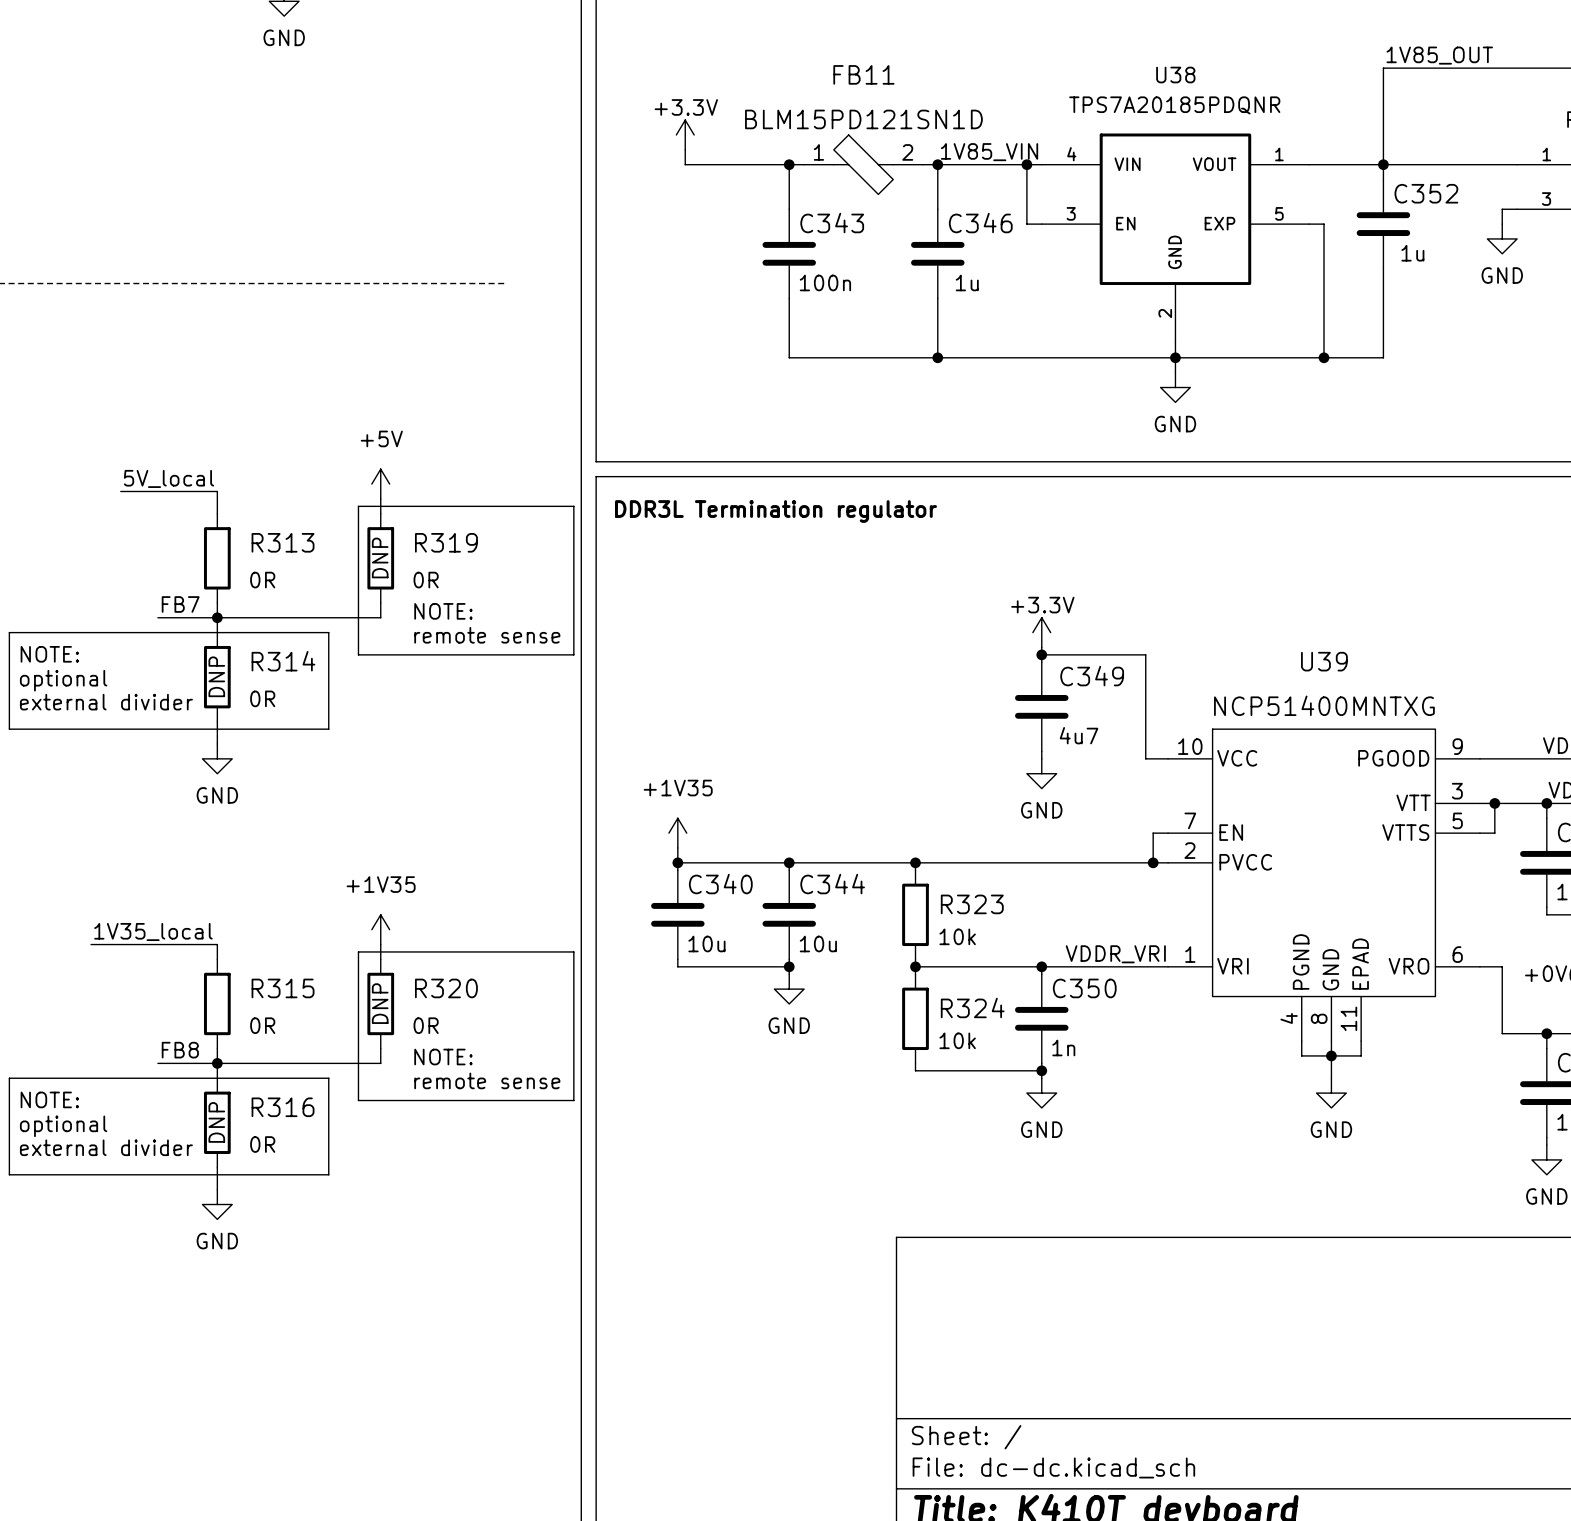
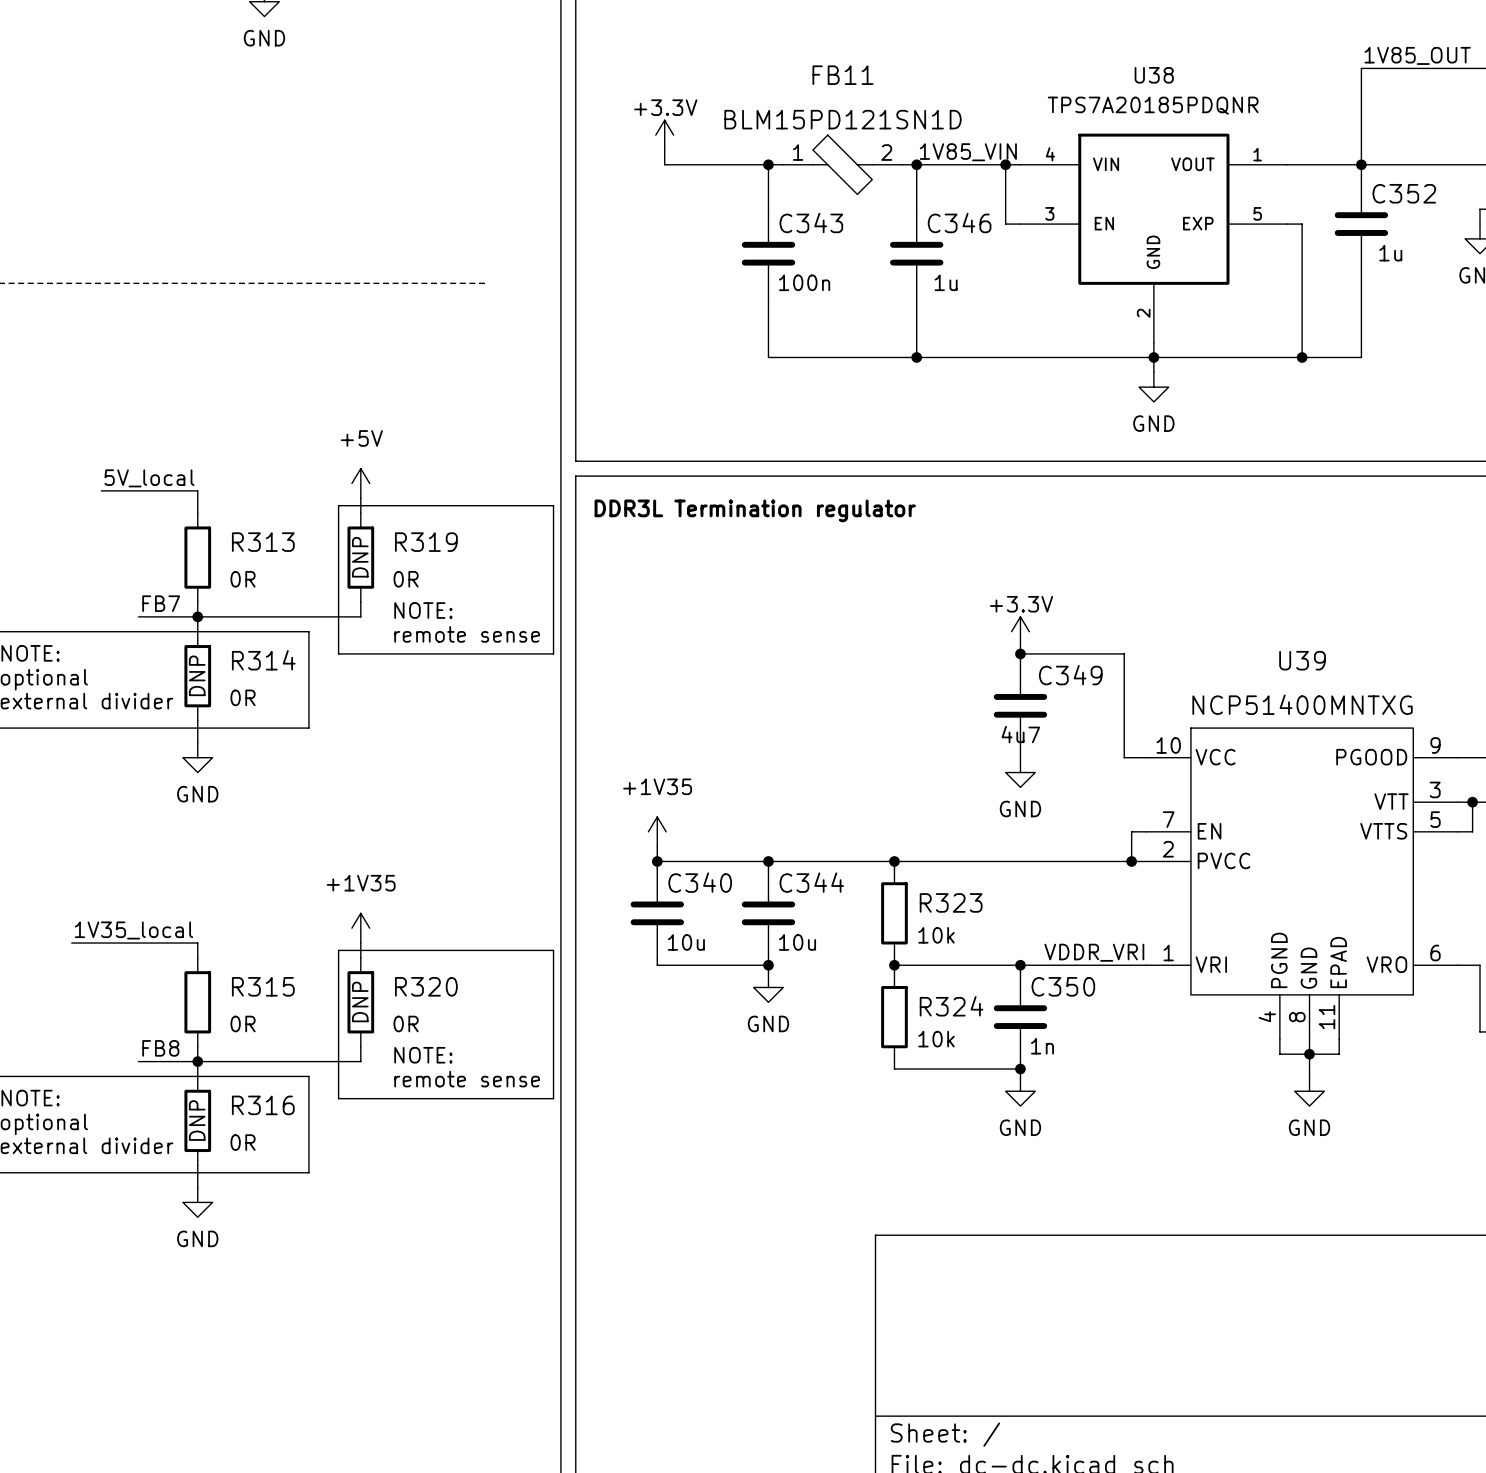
C349 text position: 4u7 (1079, 735) -> 4u7 (1020, 734)

